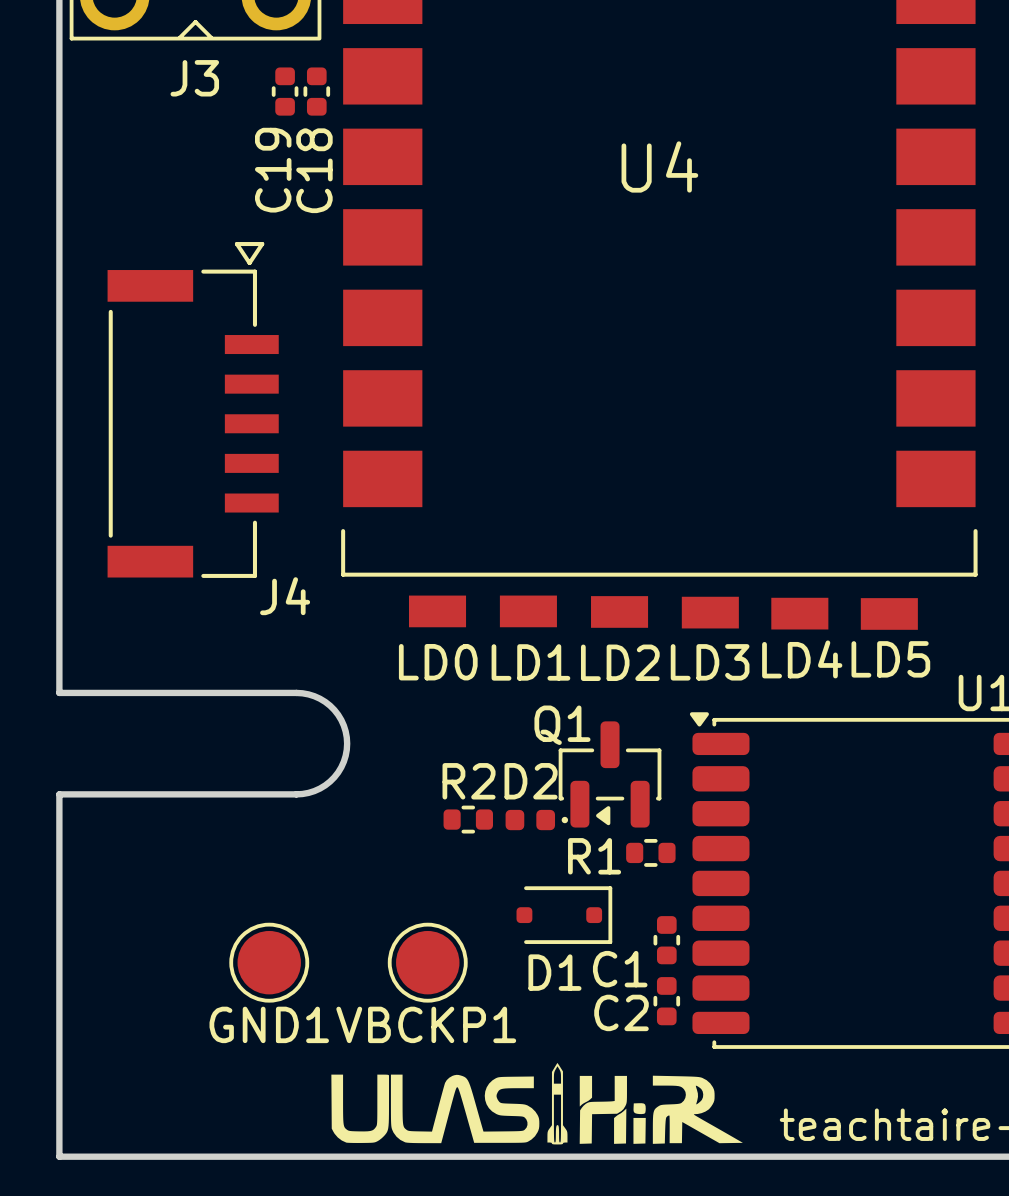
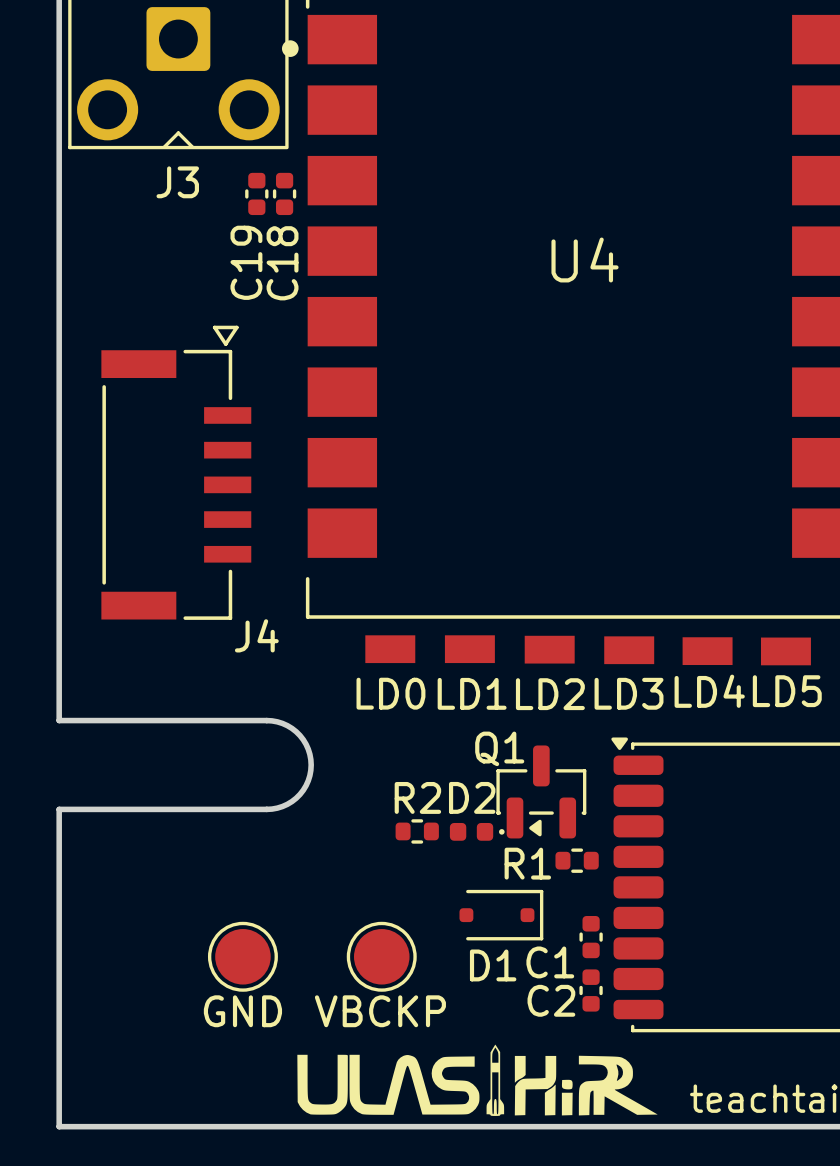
GND1 name: GND1 (269, 1024) -> GND (242, 1011)
VBCKP1 name: VBCKP1 (426, 1024) -> VBCKP (380, 1011)

